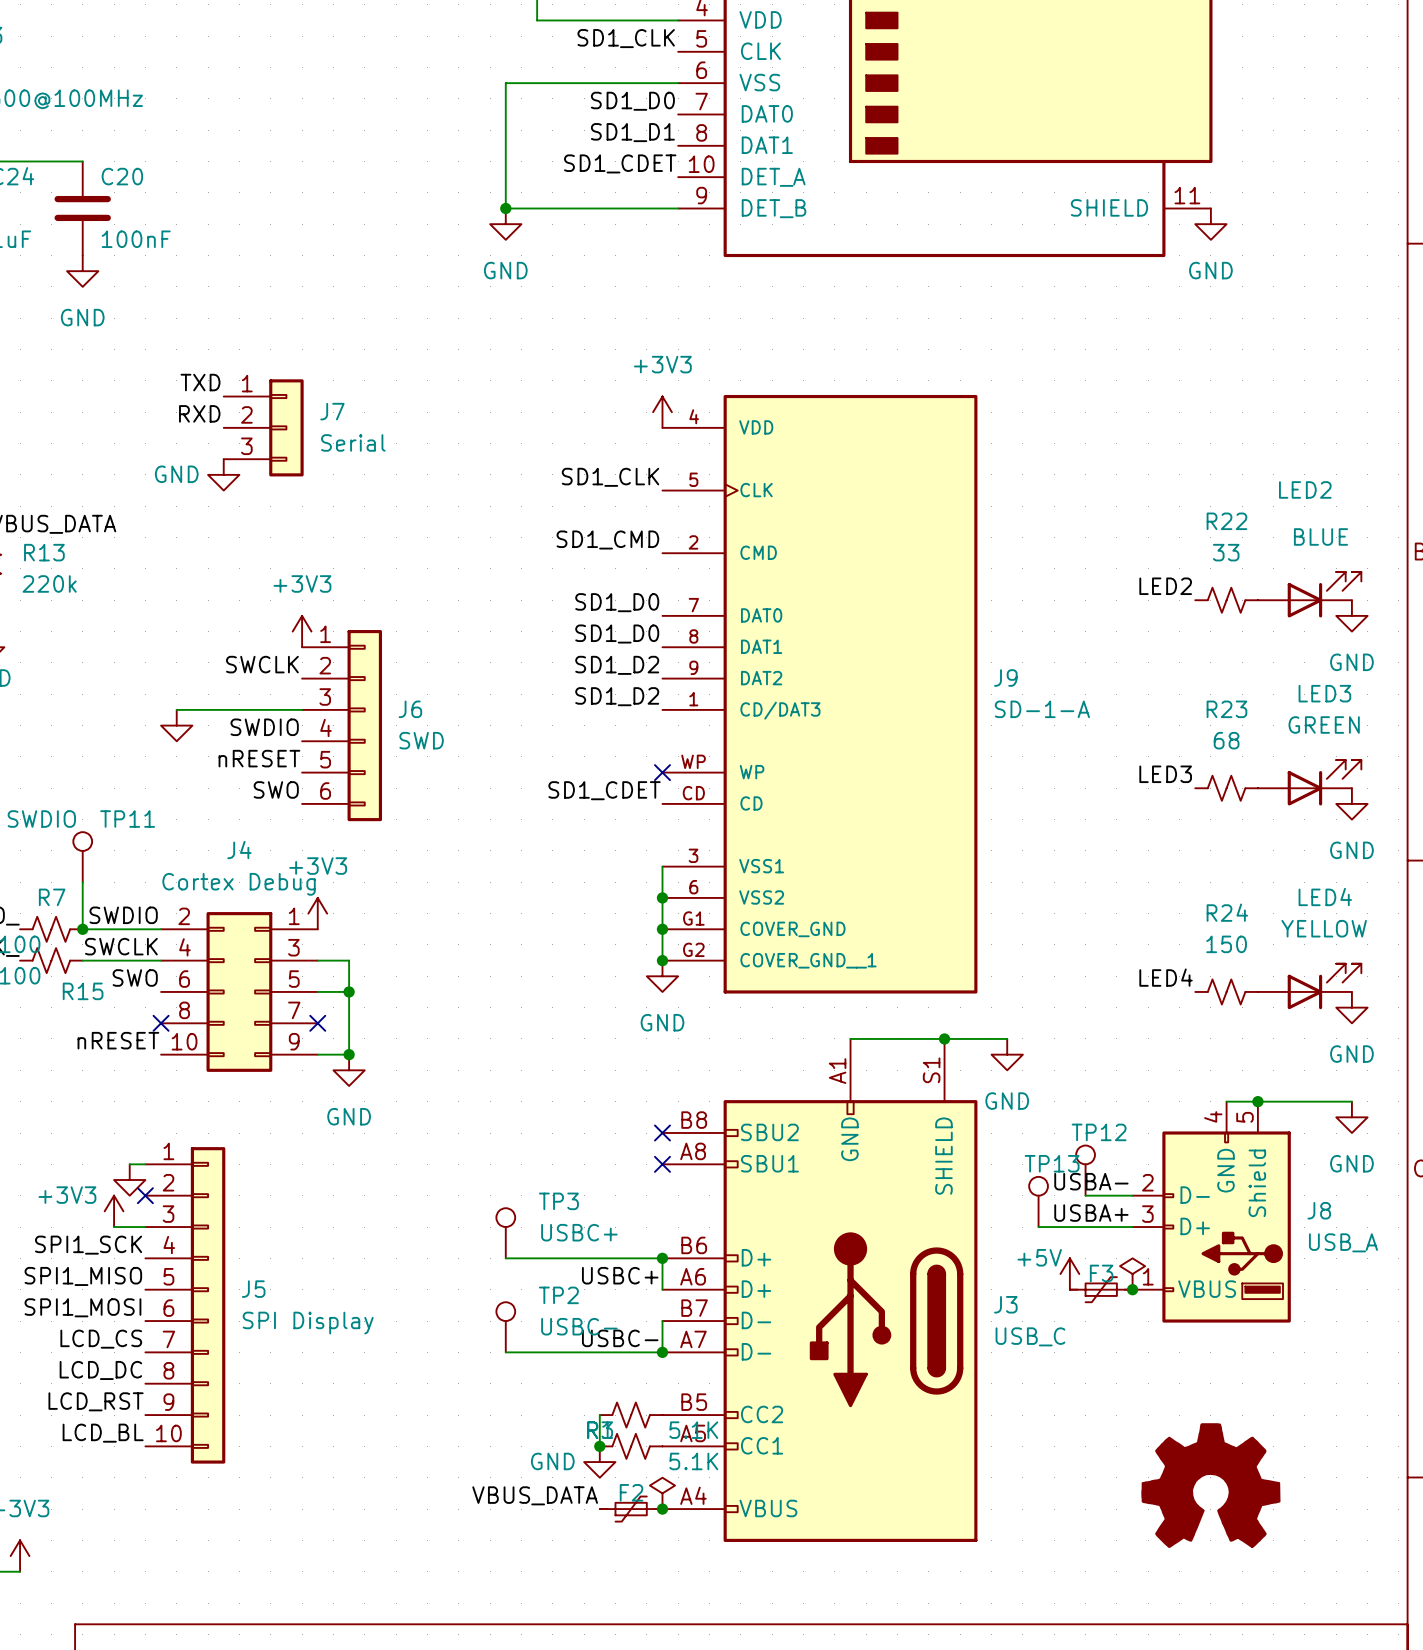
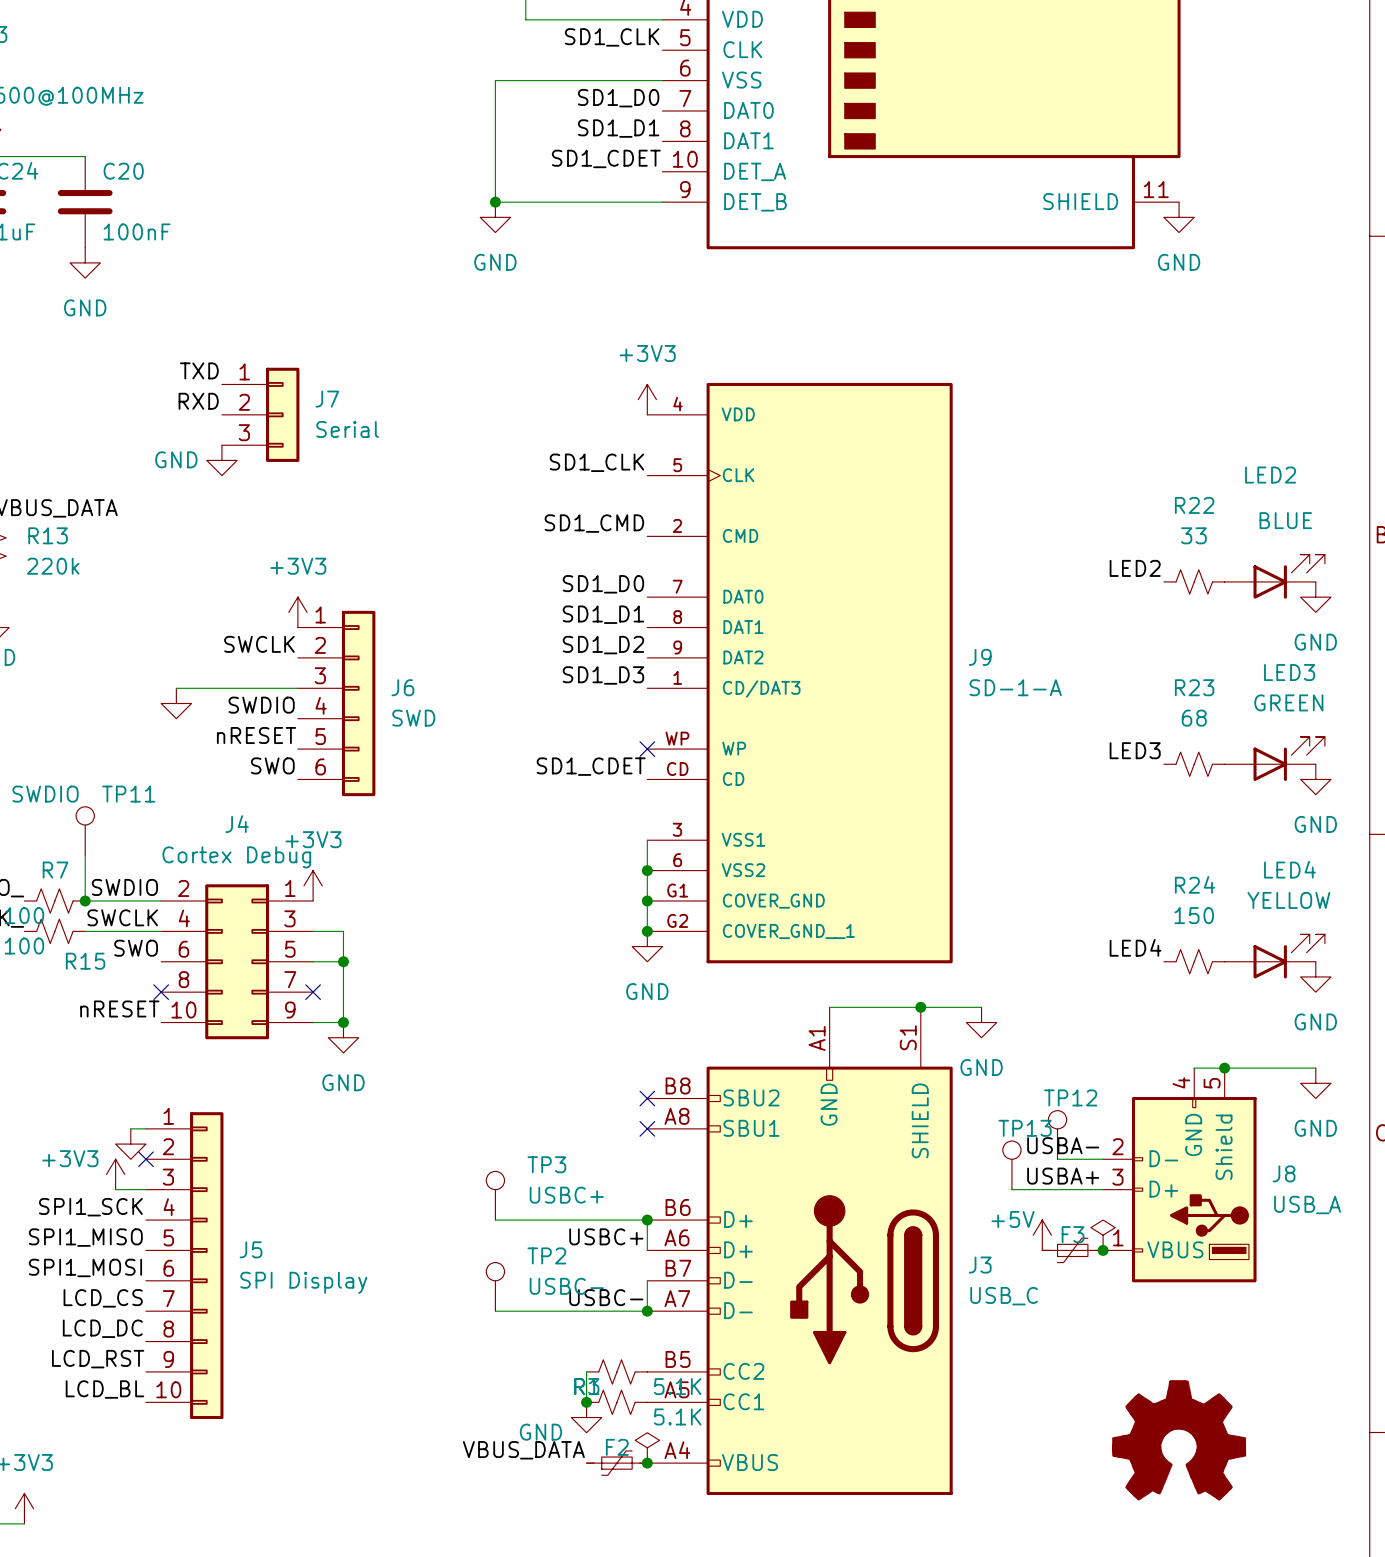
label: SD1_D0 (617, 634) -> SD1_D1 (603, 614)
label: SD1_D2 (617, 696) -> SD1_D3 (603, 675)
power symbol text position: GND (552, 1461) -> GND (540, 1432)

